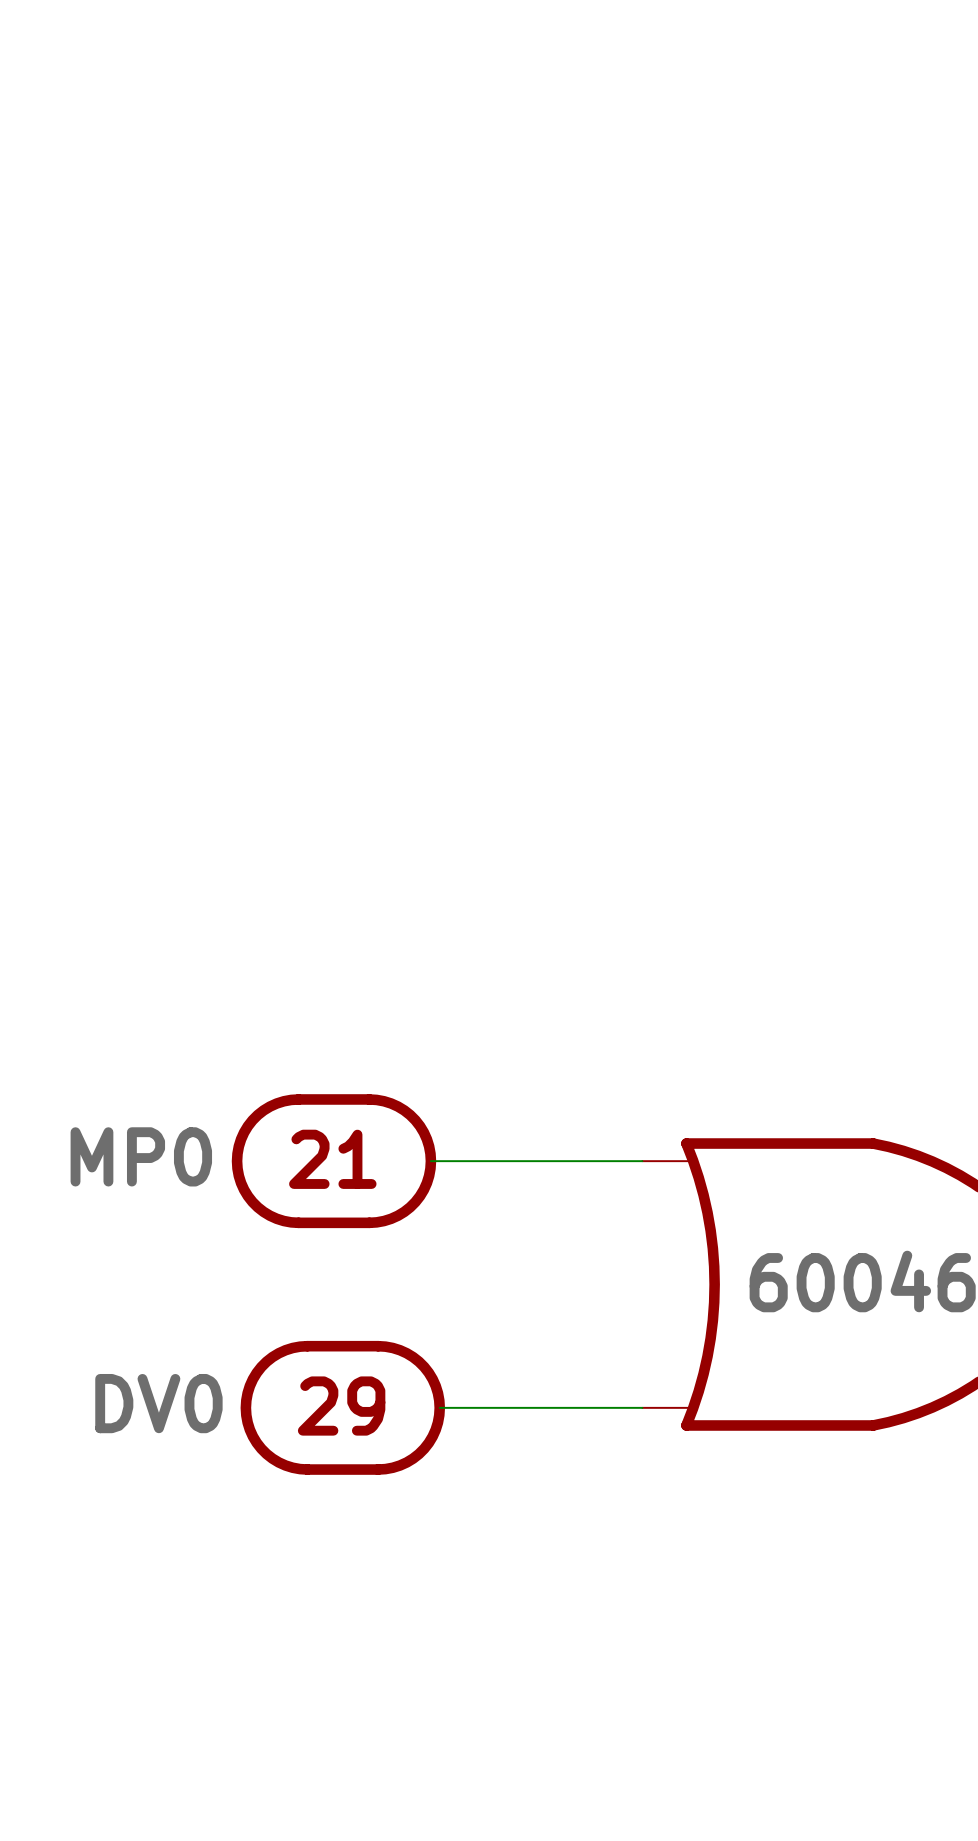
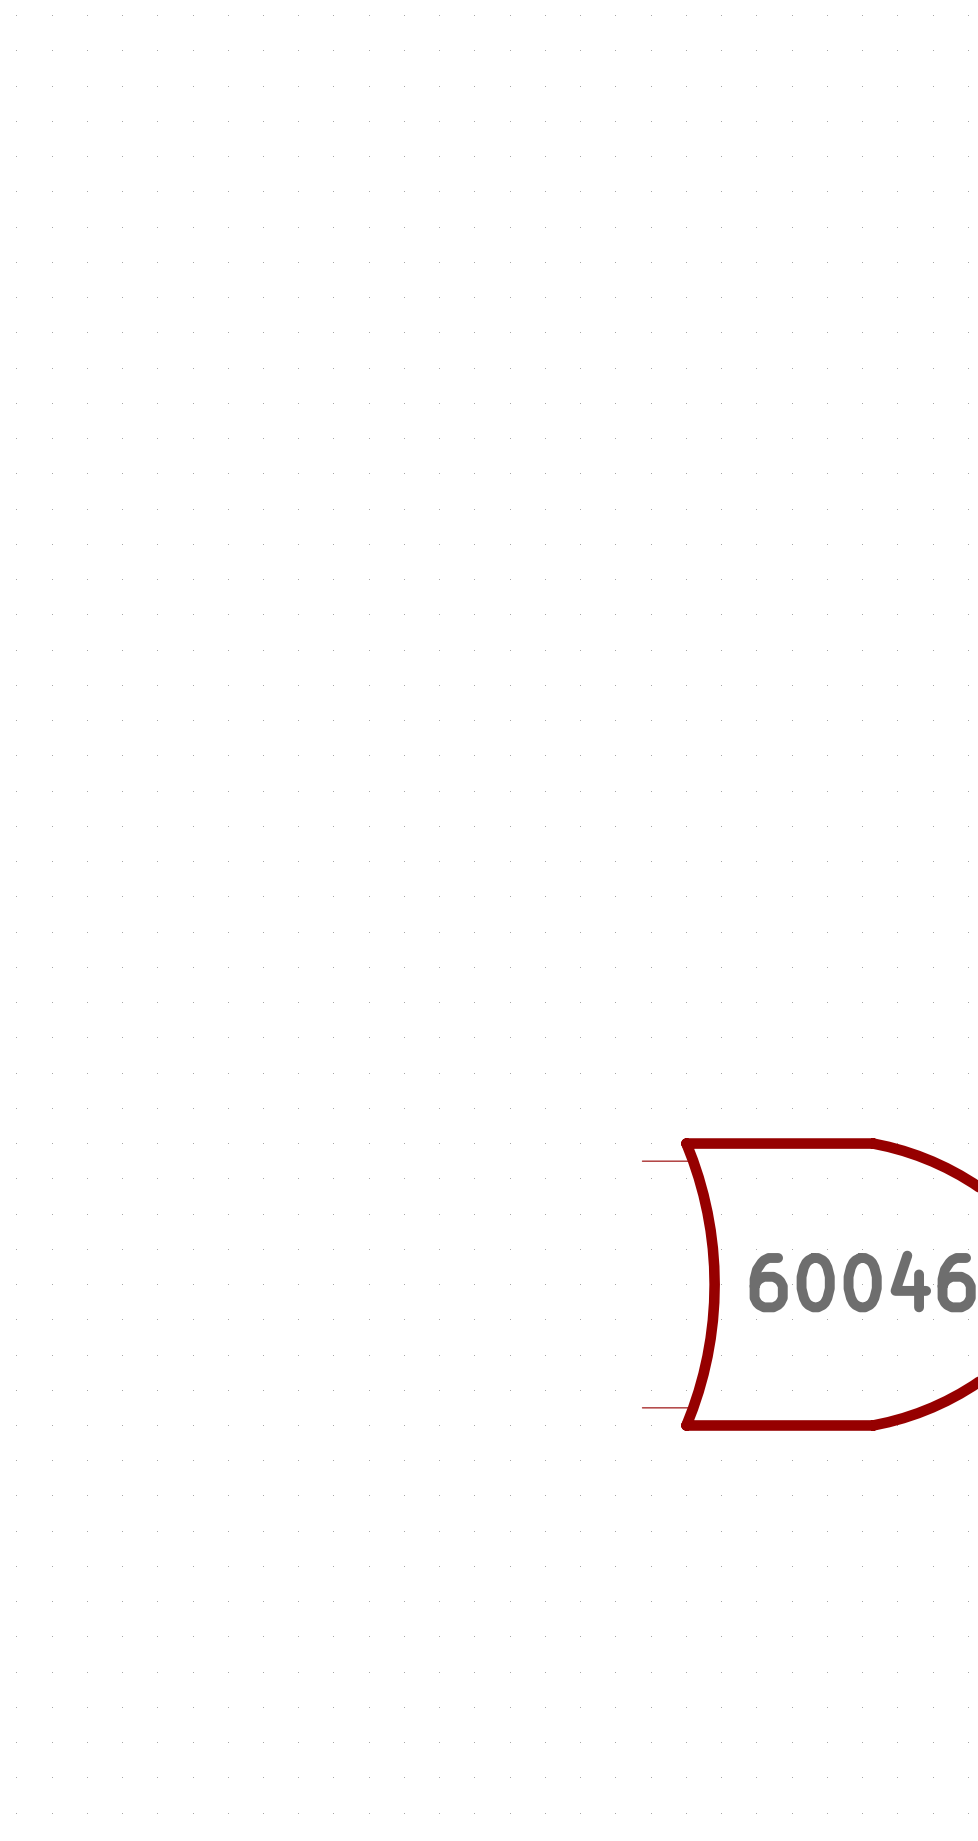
part: (333, 1161) -> none
wire: (430, 1161) (642, 1161) -> none
part: (342, 1407) -> none
wire: (439, 1407) (642, 1407) -> none

